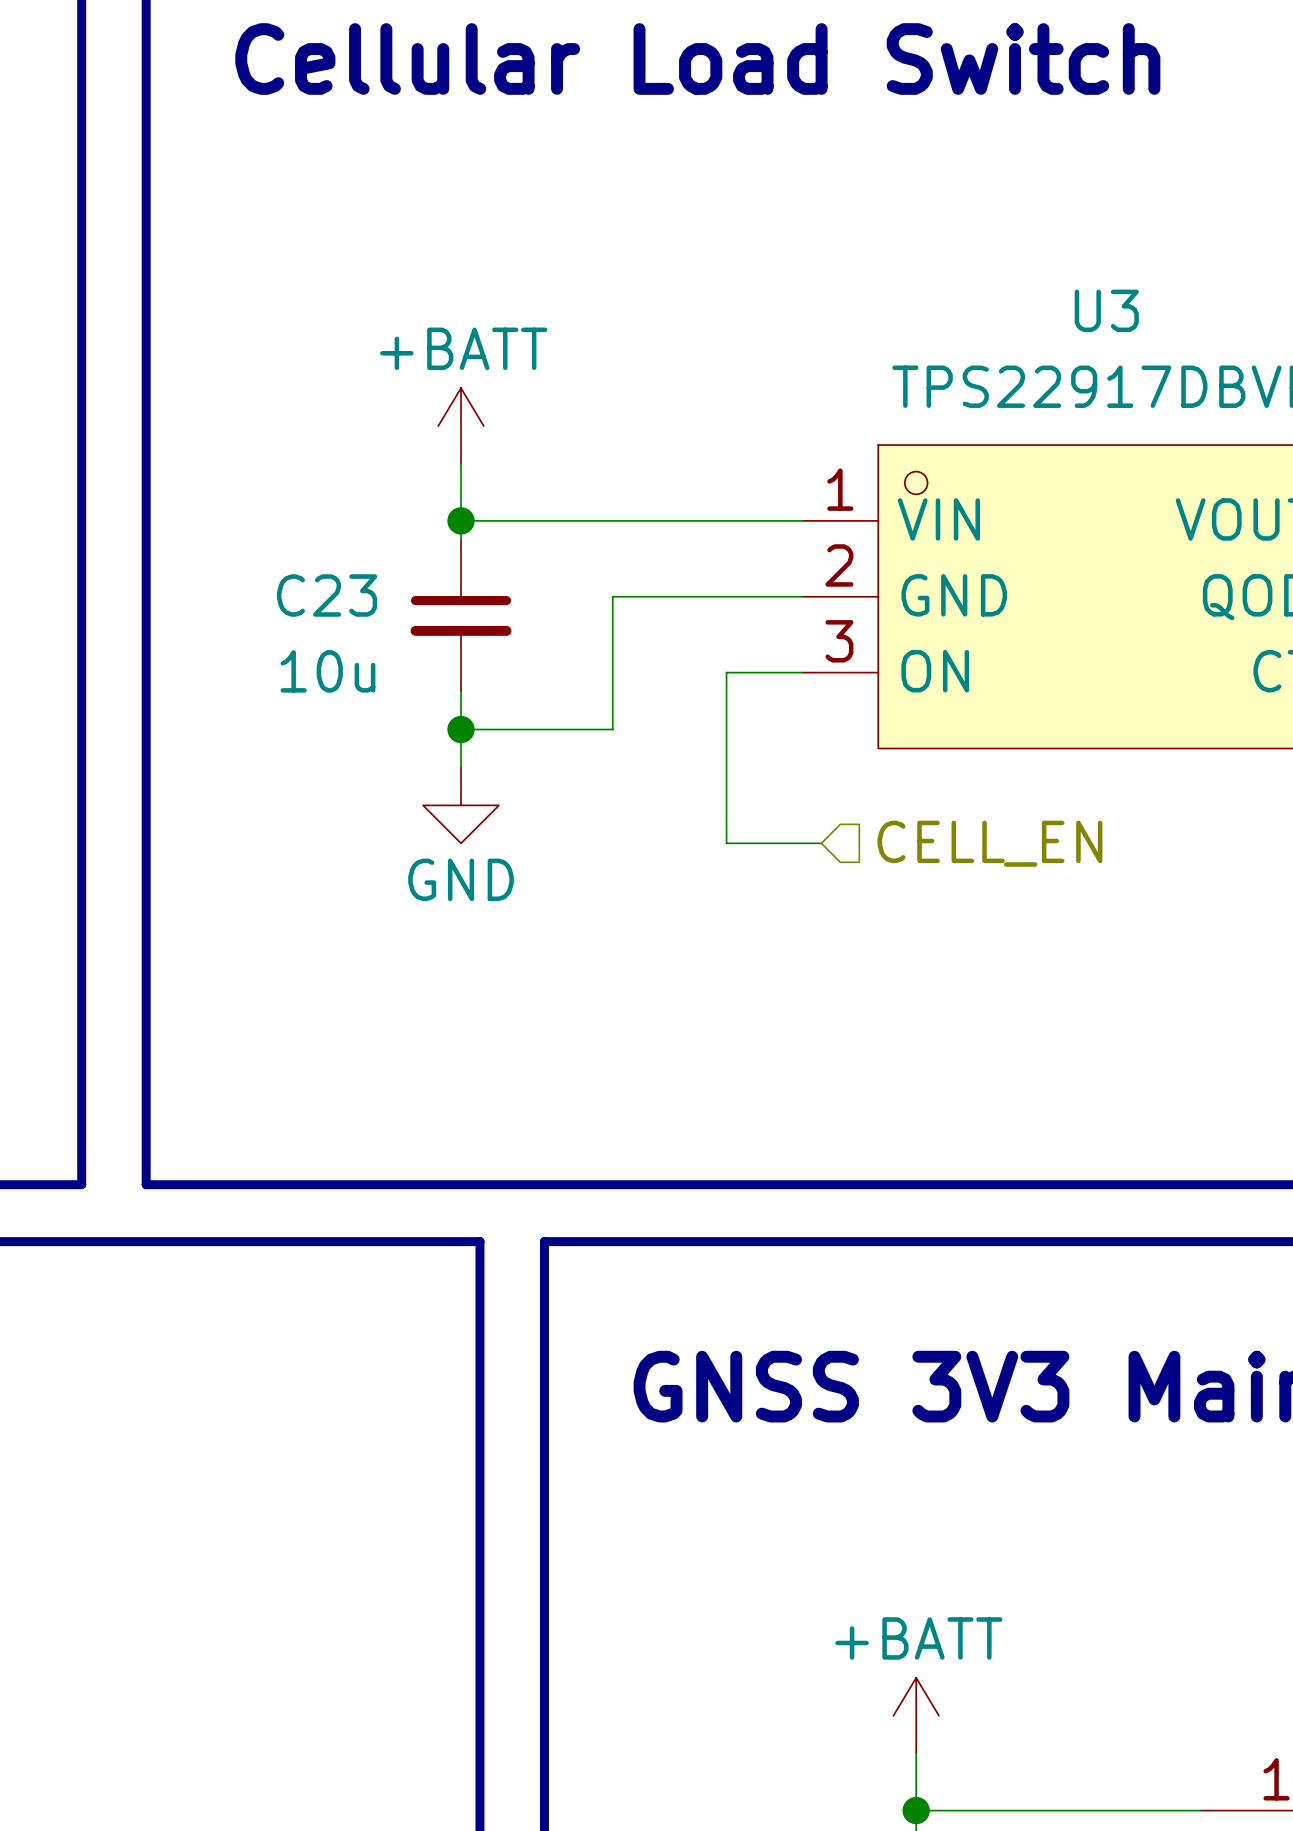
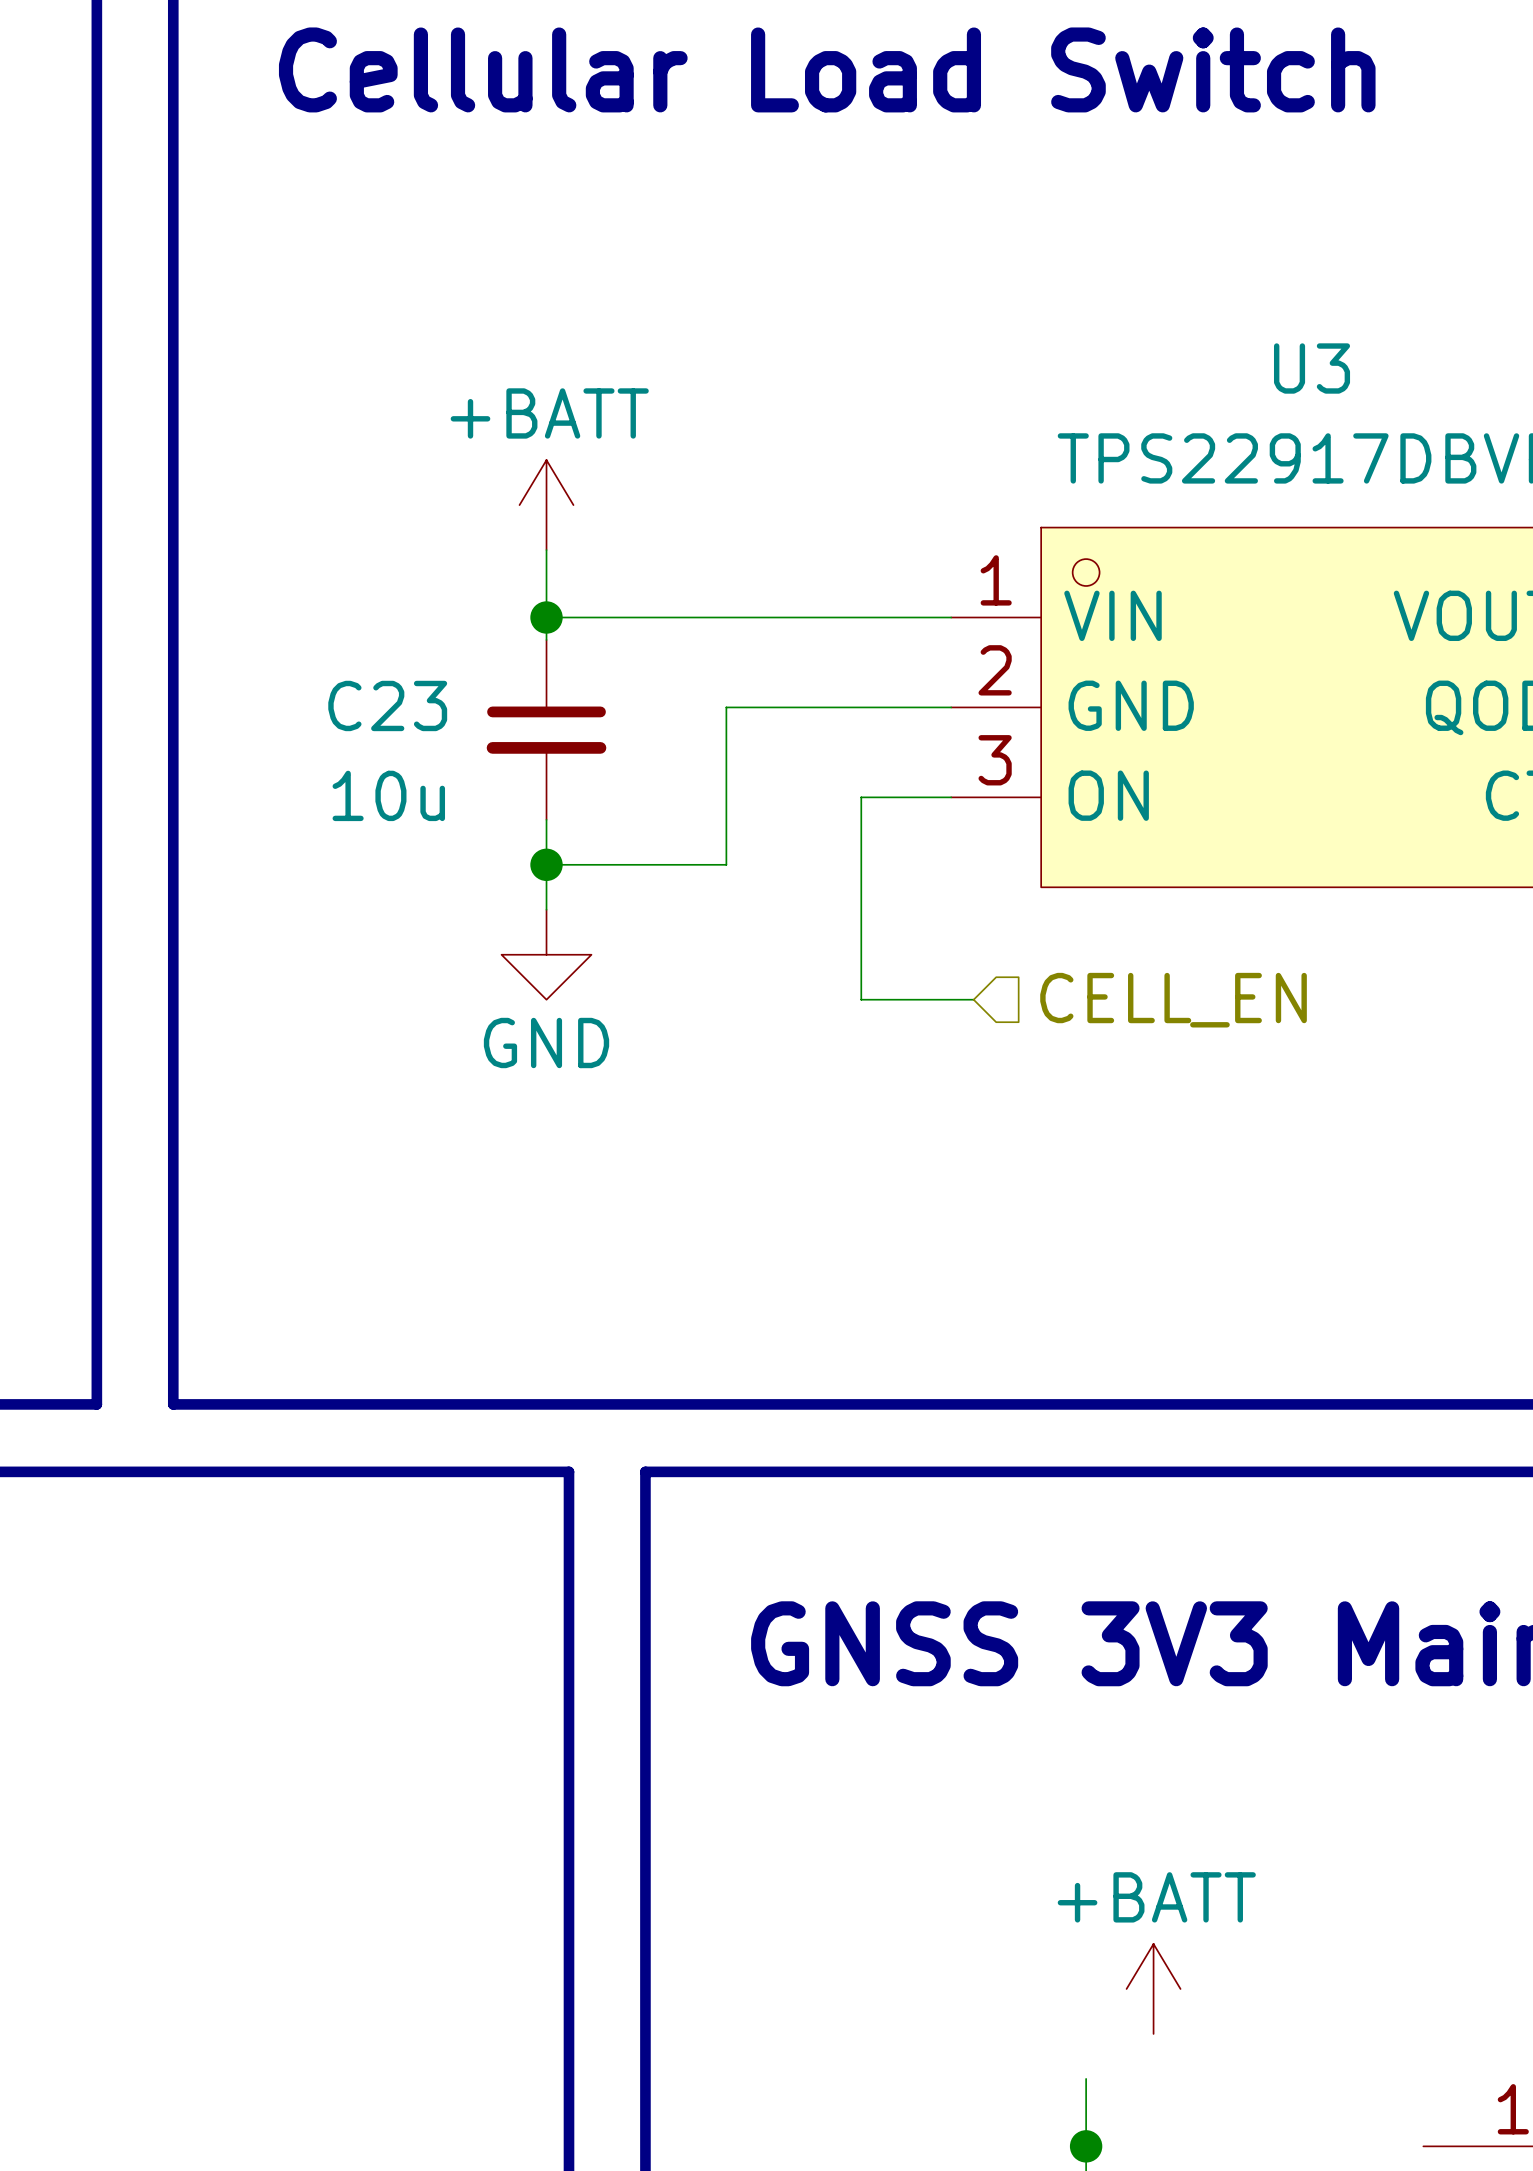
power symbol position: +BATT (916, 1715) -> +BATT (1153, 1988)
wire: (916, 1810) (1200, 1810) -> none

